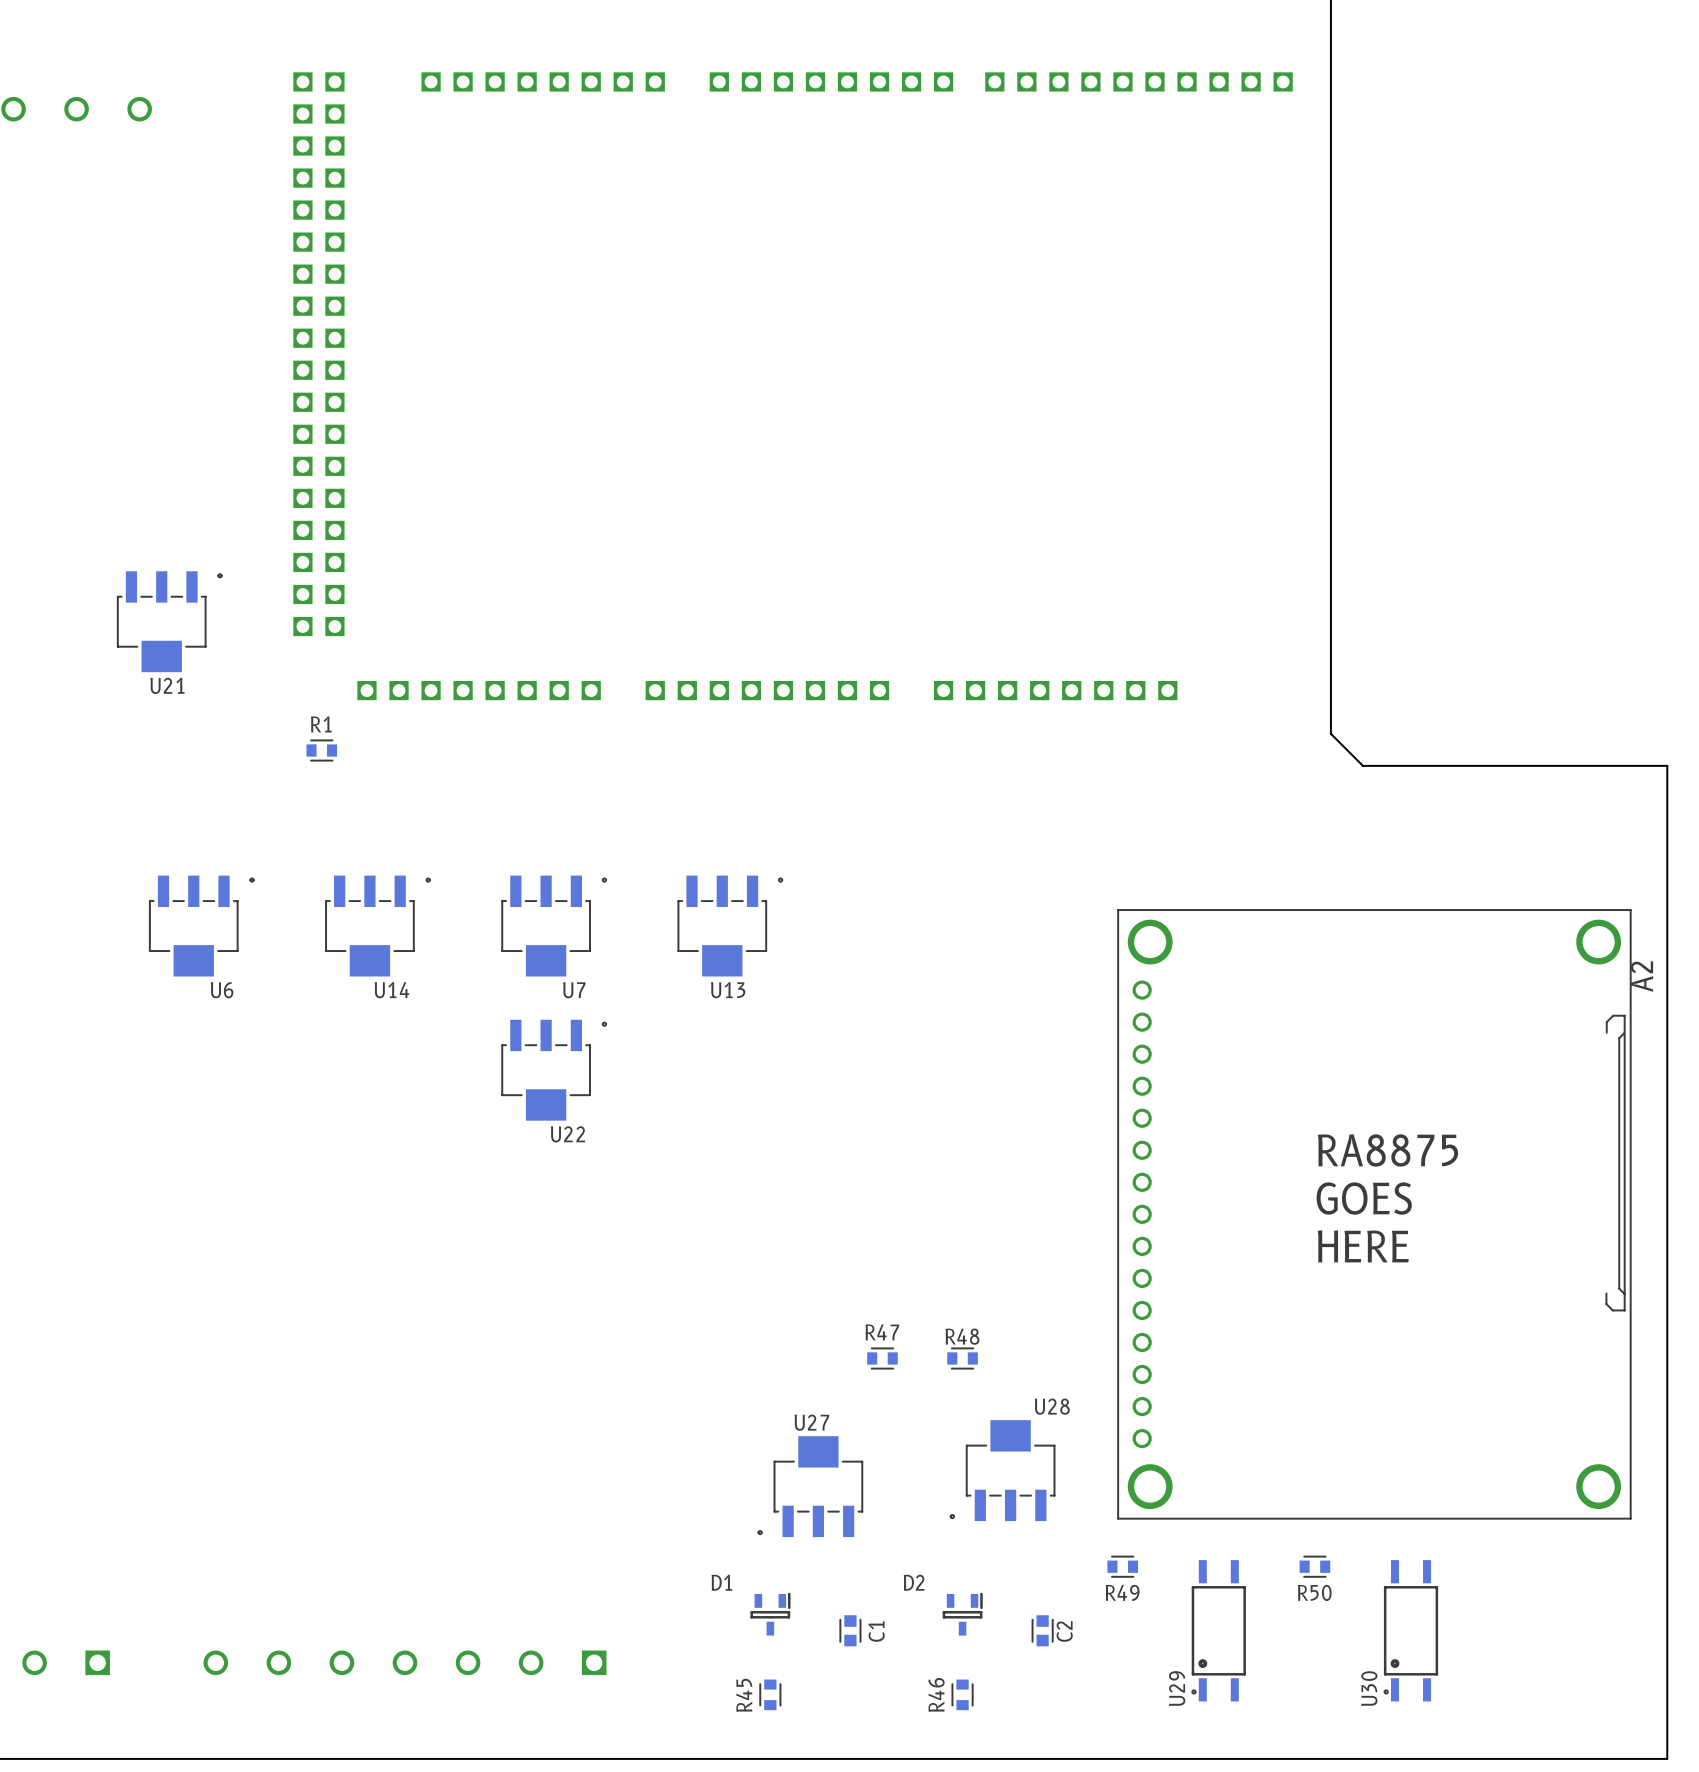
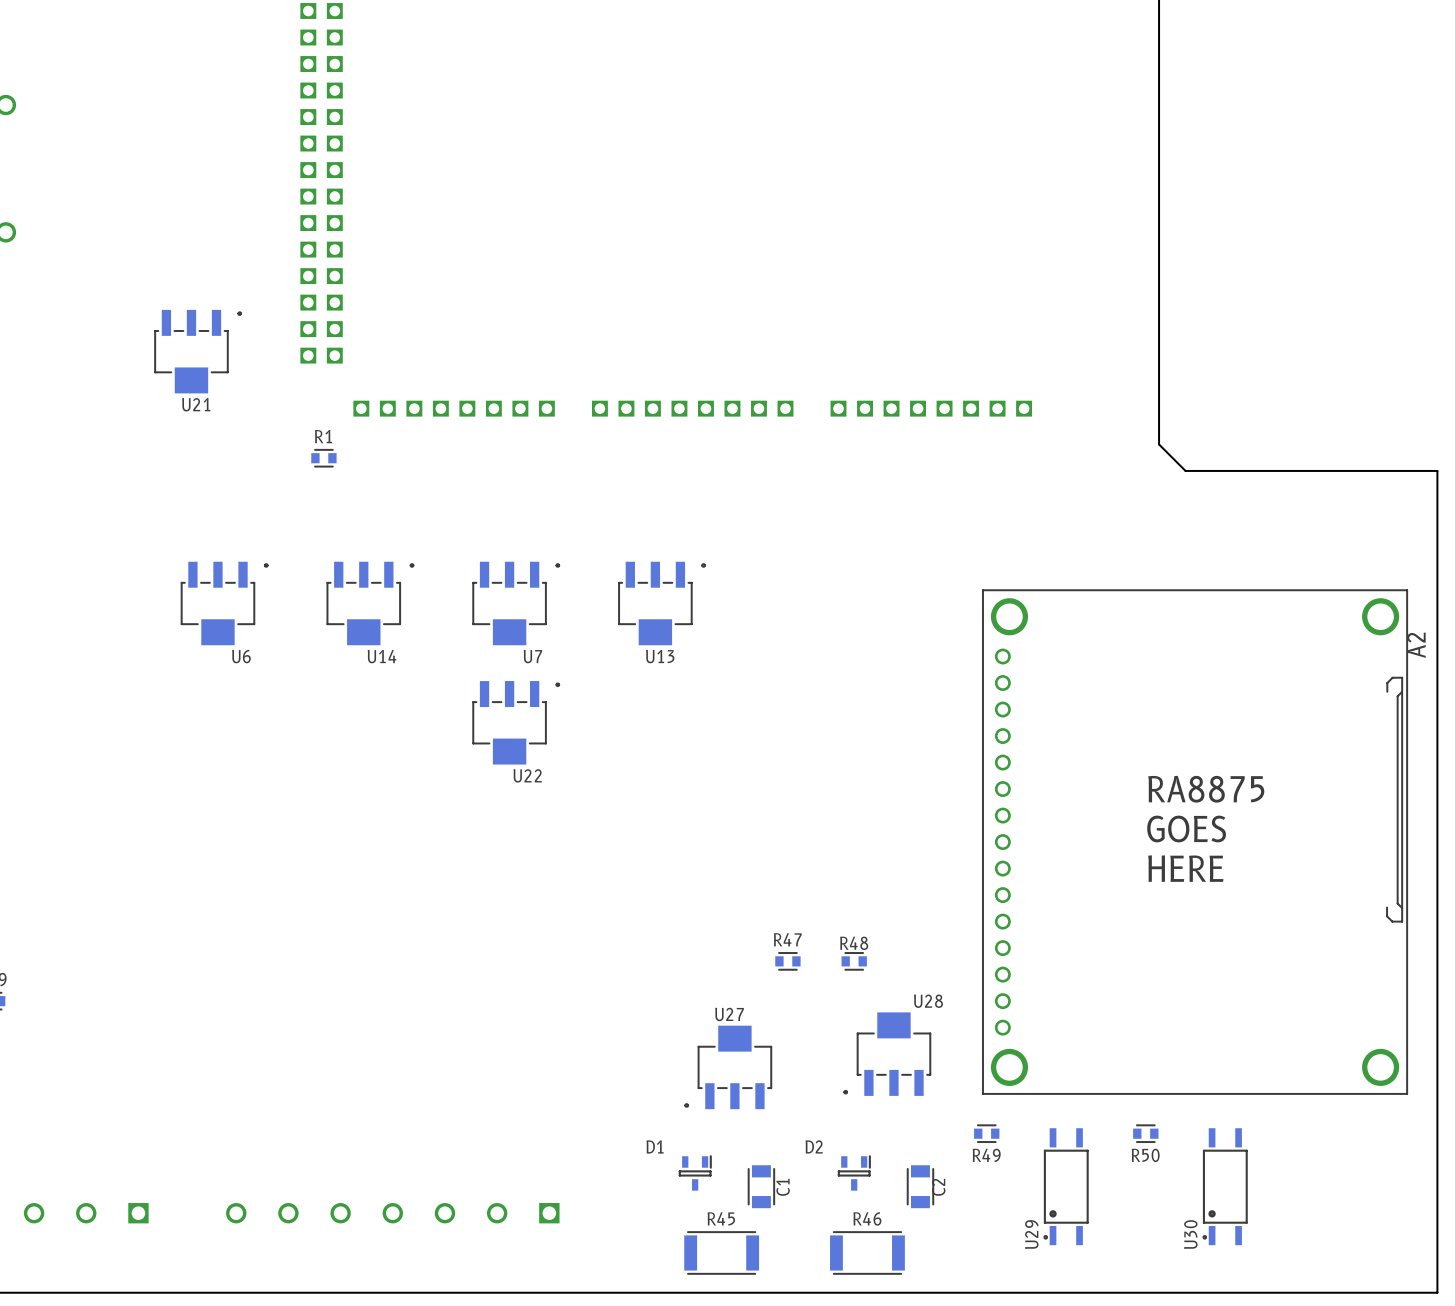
C1 footprint: [839, 1615, 862, 1647] -> [748, 1165, 775, 1209]
C2 footprint: [1031, 1615, 1054, 1647] -> [907, 1165, 934, 1209]
R45 footprint: [759, 1679, 782, 1711] -> [684, 1231, 760, 1275]
R46 footprint: [951, 1679, 974, 1711] -> [830, 1231, 905, 1275]
R46 name position: R46 (936, 1694) -> R46 (867, 1218)
R45 name position: R45 (744, 1695) -> R45 (721, 1218)

